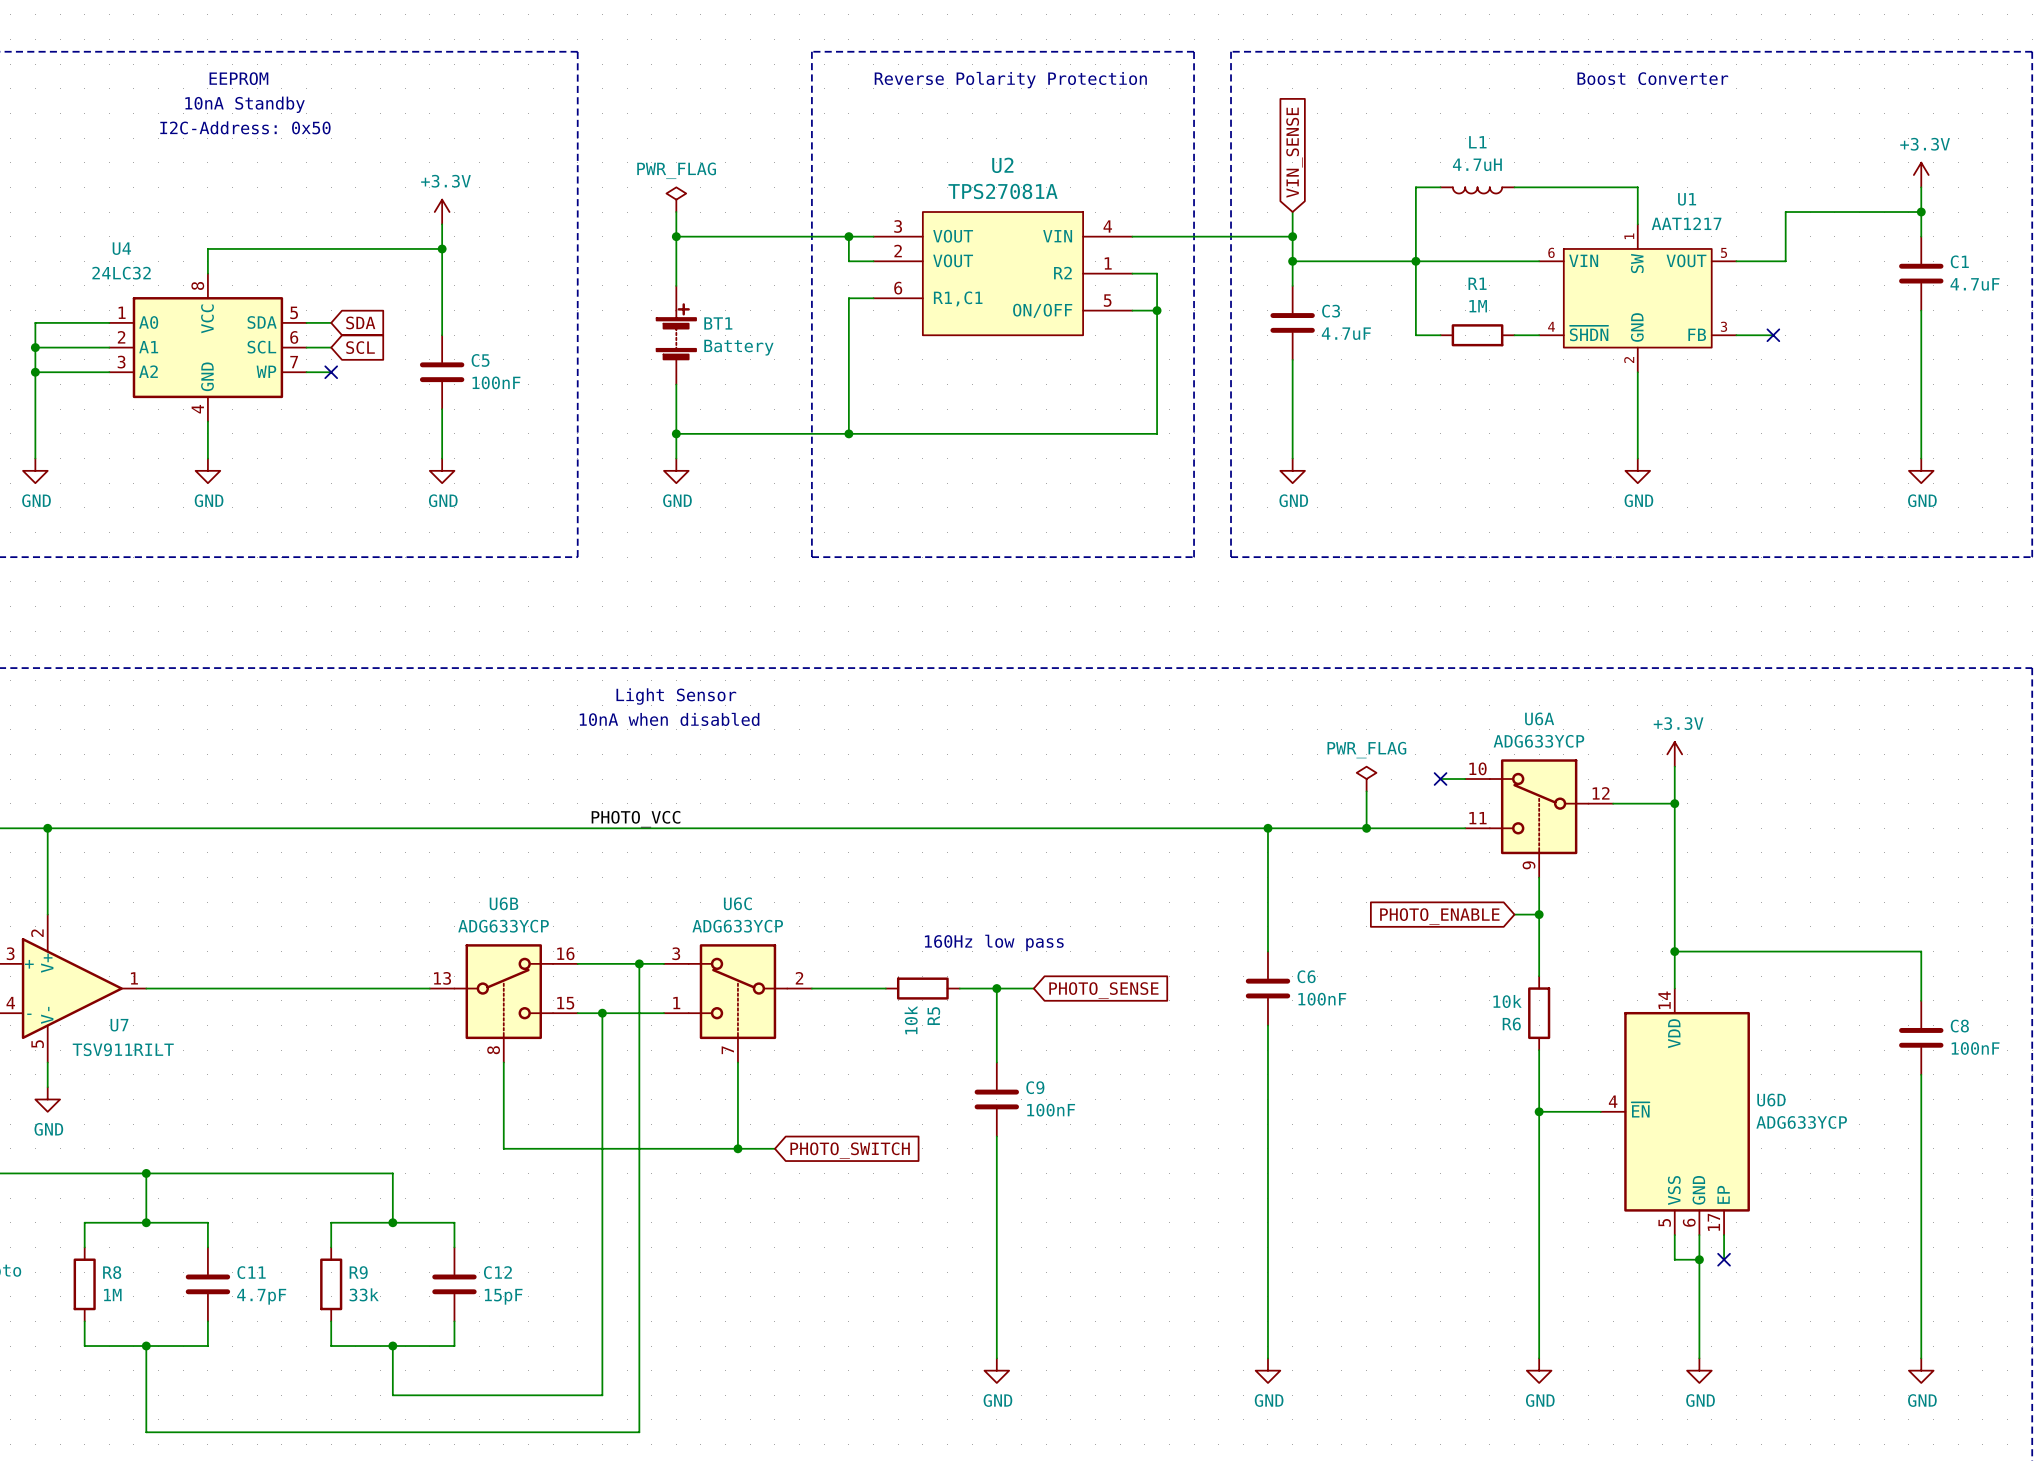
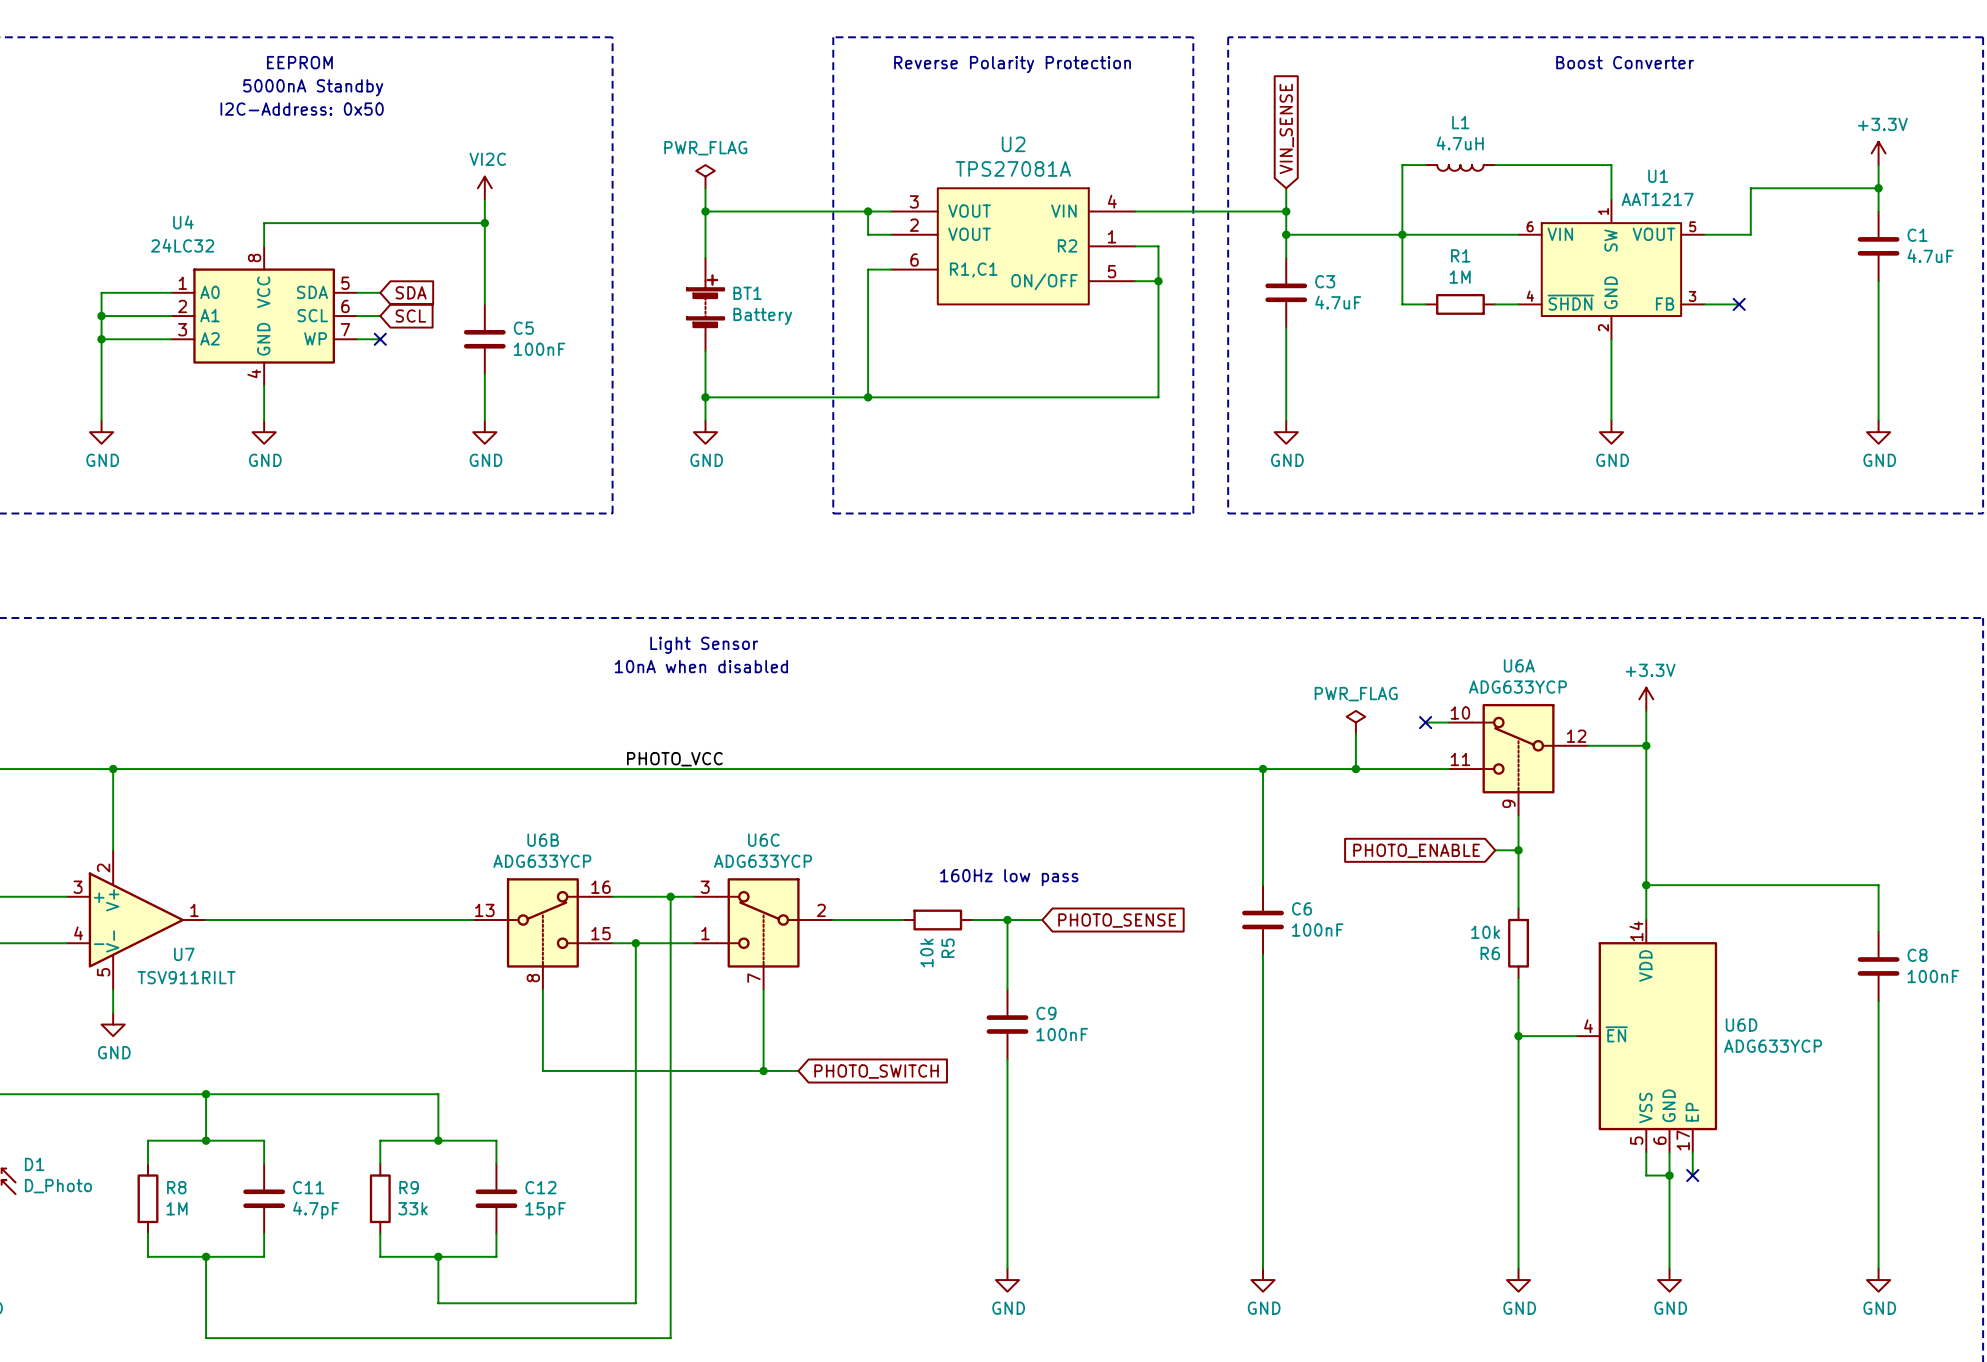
text: 10nA Standby (245, 104) -> 5000nA Standby (313, 87)
power symbol: +3.3V (442, 212) -> VI2C (484, 188)

